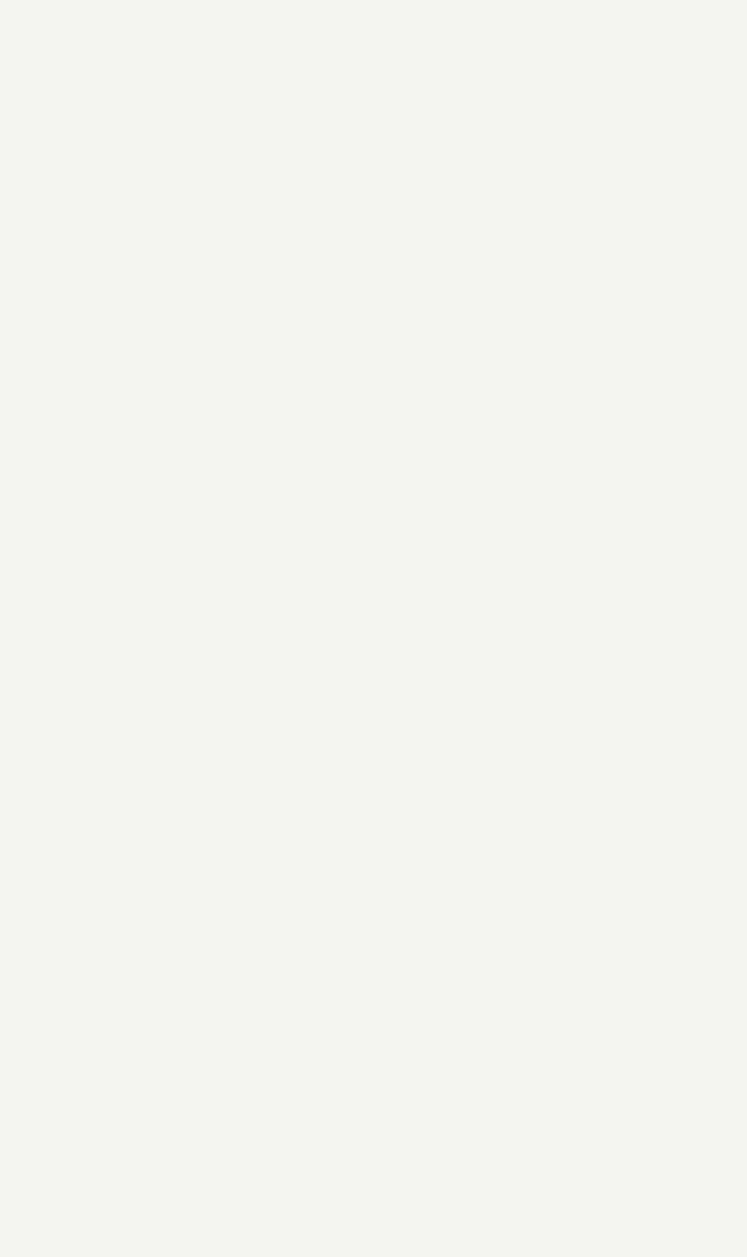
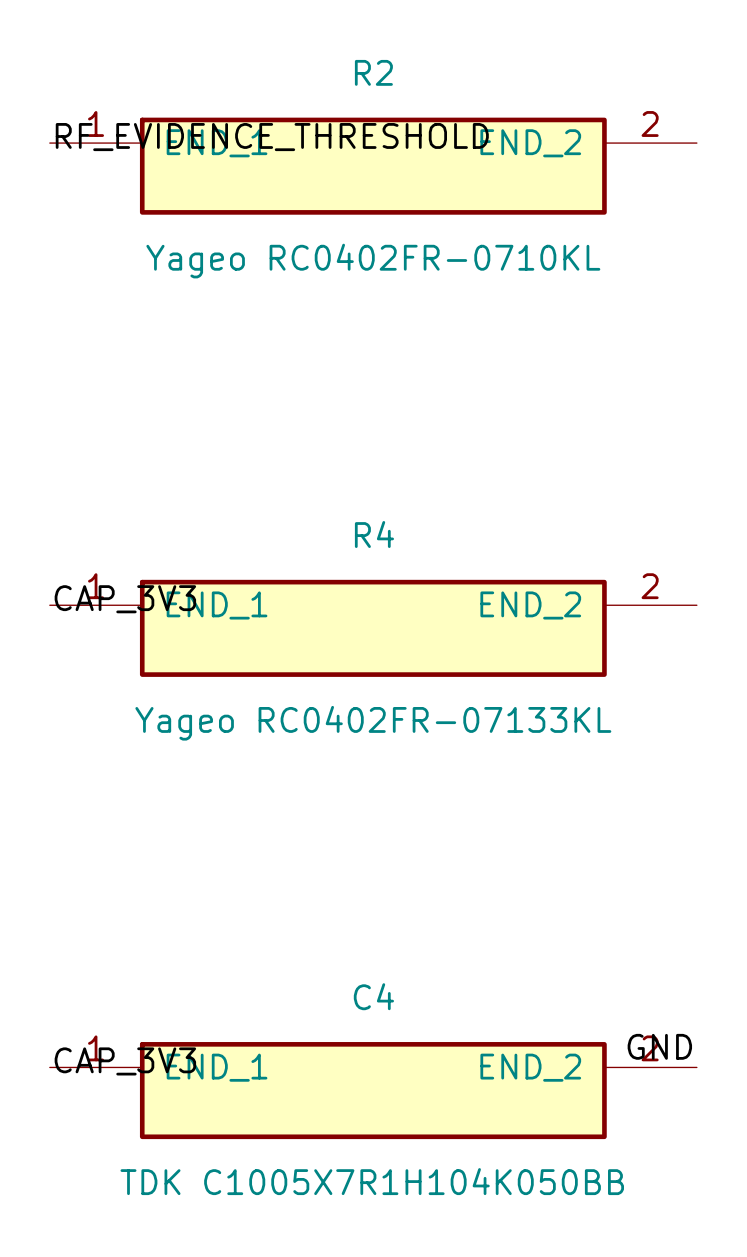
label: none -> RF_EVIDENCE_THRESHOLD (272, 137)
R2: none -> Yageo RC0402FR-0710KL (373, 166)
label: none -> CAP_3V3 (125, 599)
R4: none -> Yageo RC0402FR-07133KL (373, 628)
label: none -> GND (659, 1046)
label: none -> CAP_3V3 (125, 1061)
C4: none -> TDK C1005X7R1H104K050BB (373, 1090)

